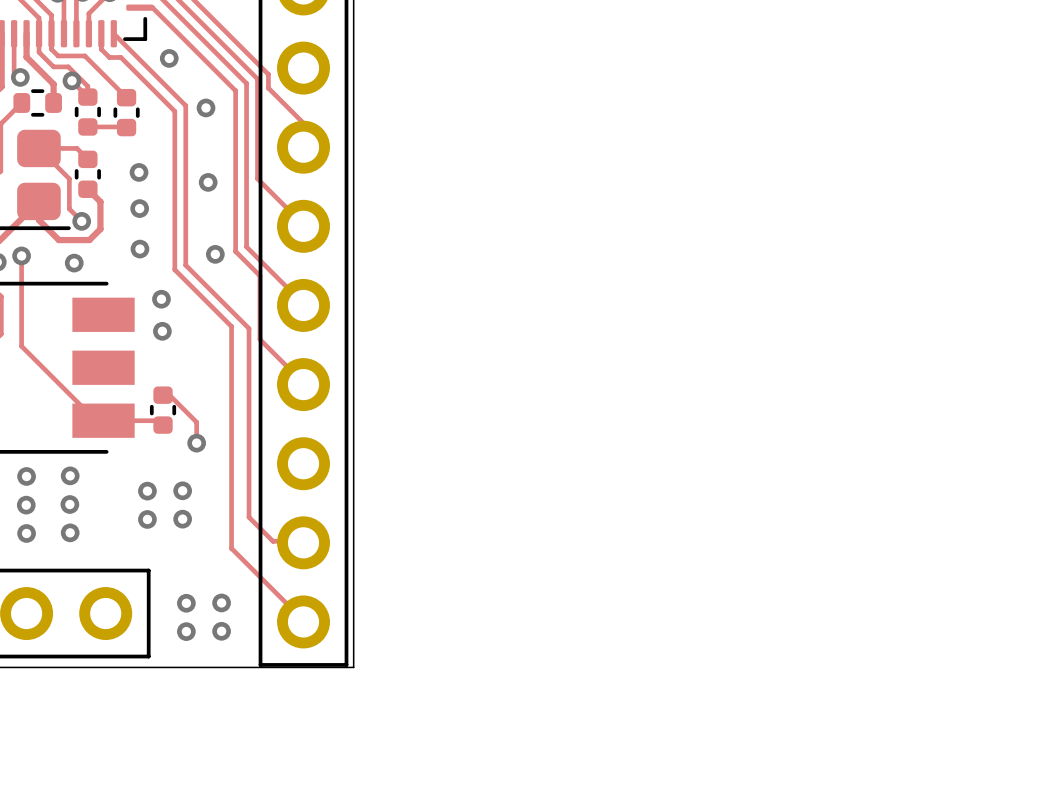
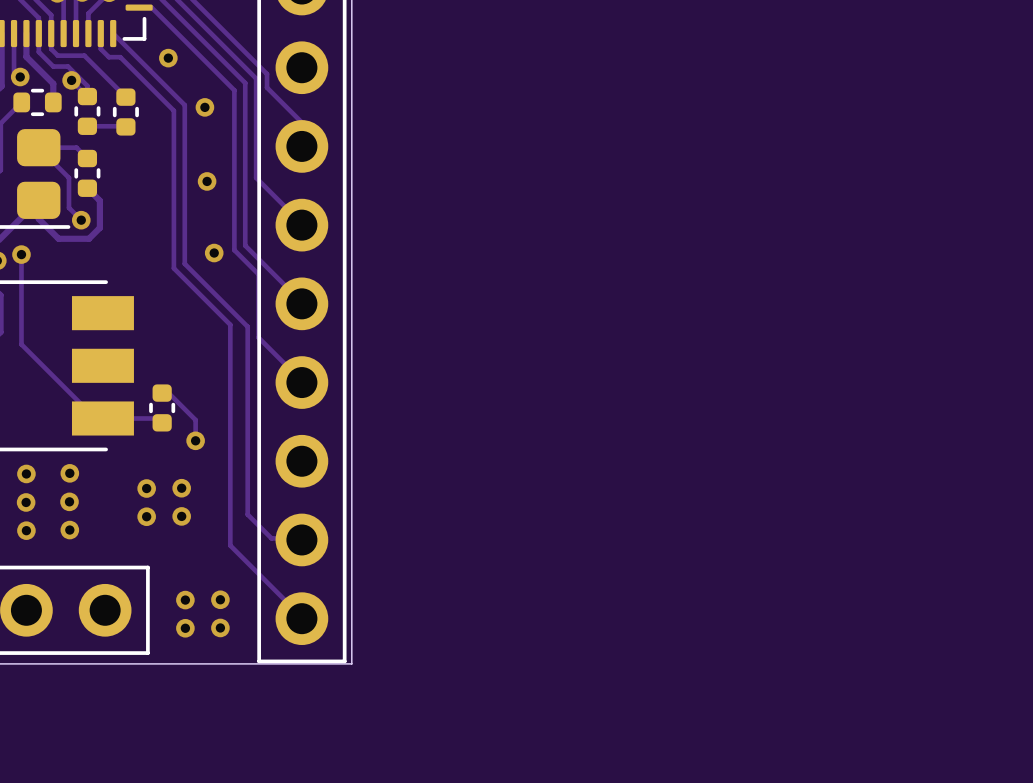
via: (139, 172) -> none
via: (139, 208) -> none
via: (139, 249) -> none
via: (74, 263) -> none
via: (161, 299) -> none
via: (162, 331) -> none

